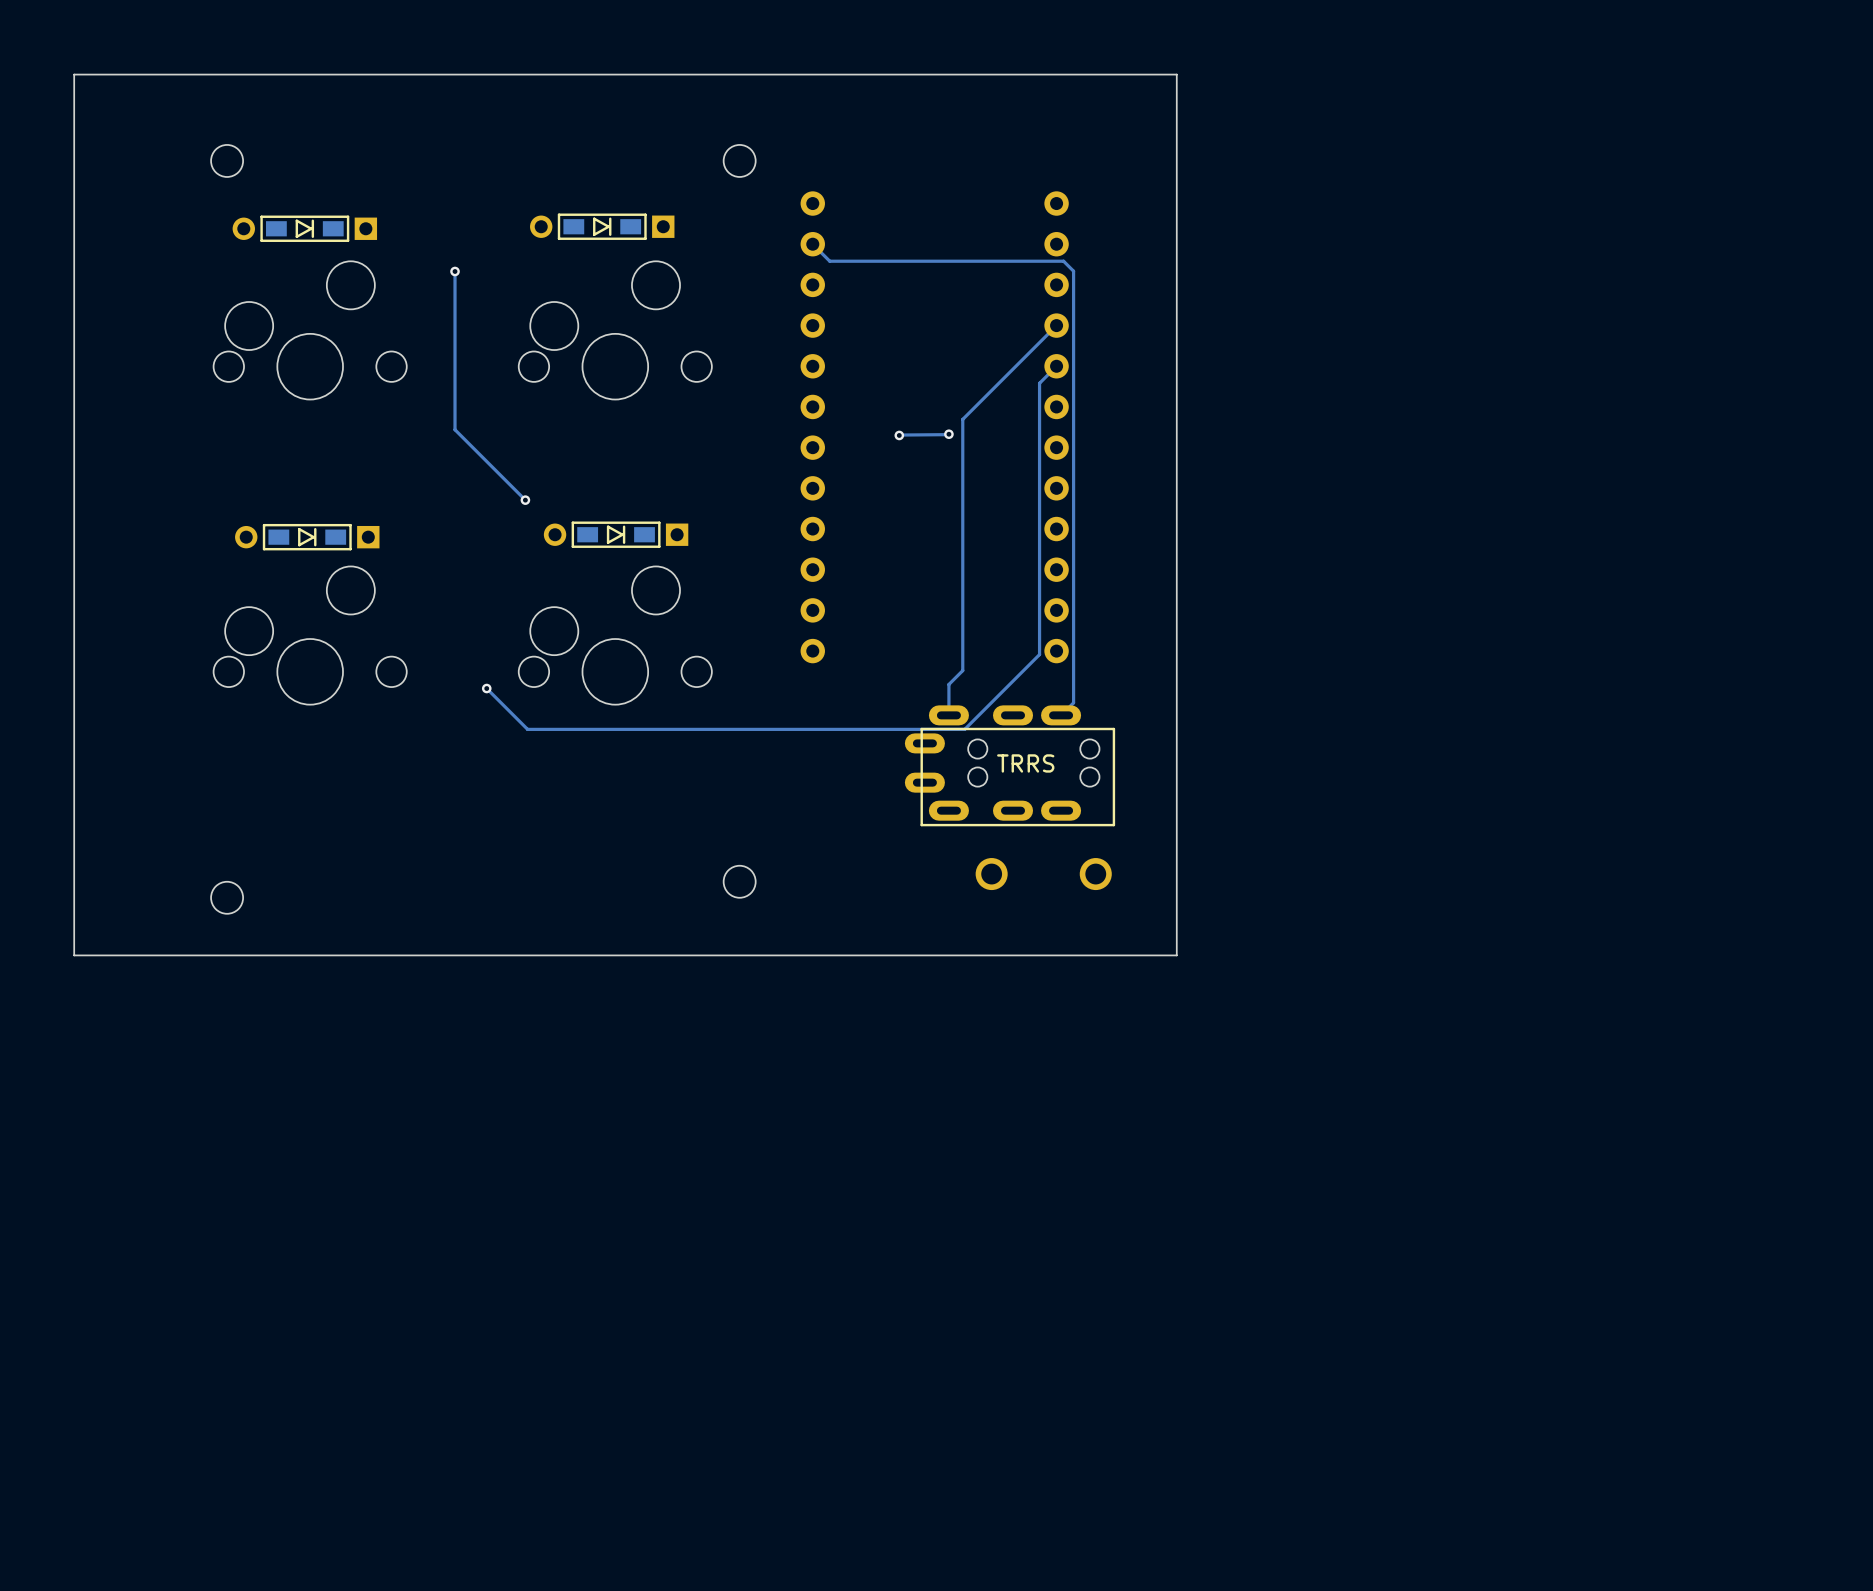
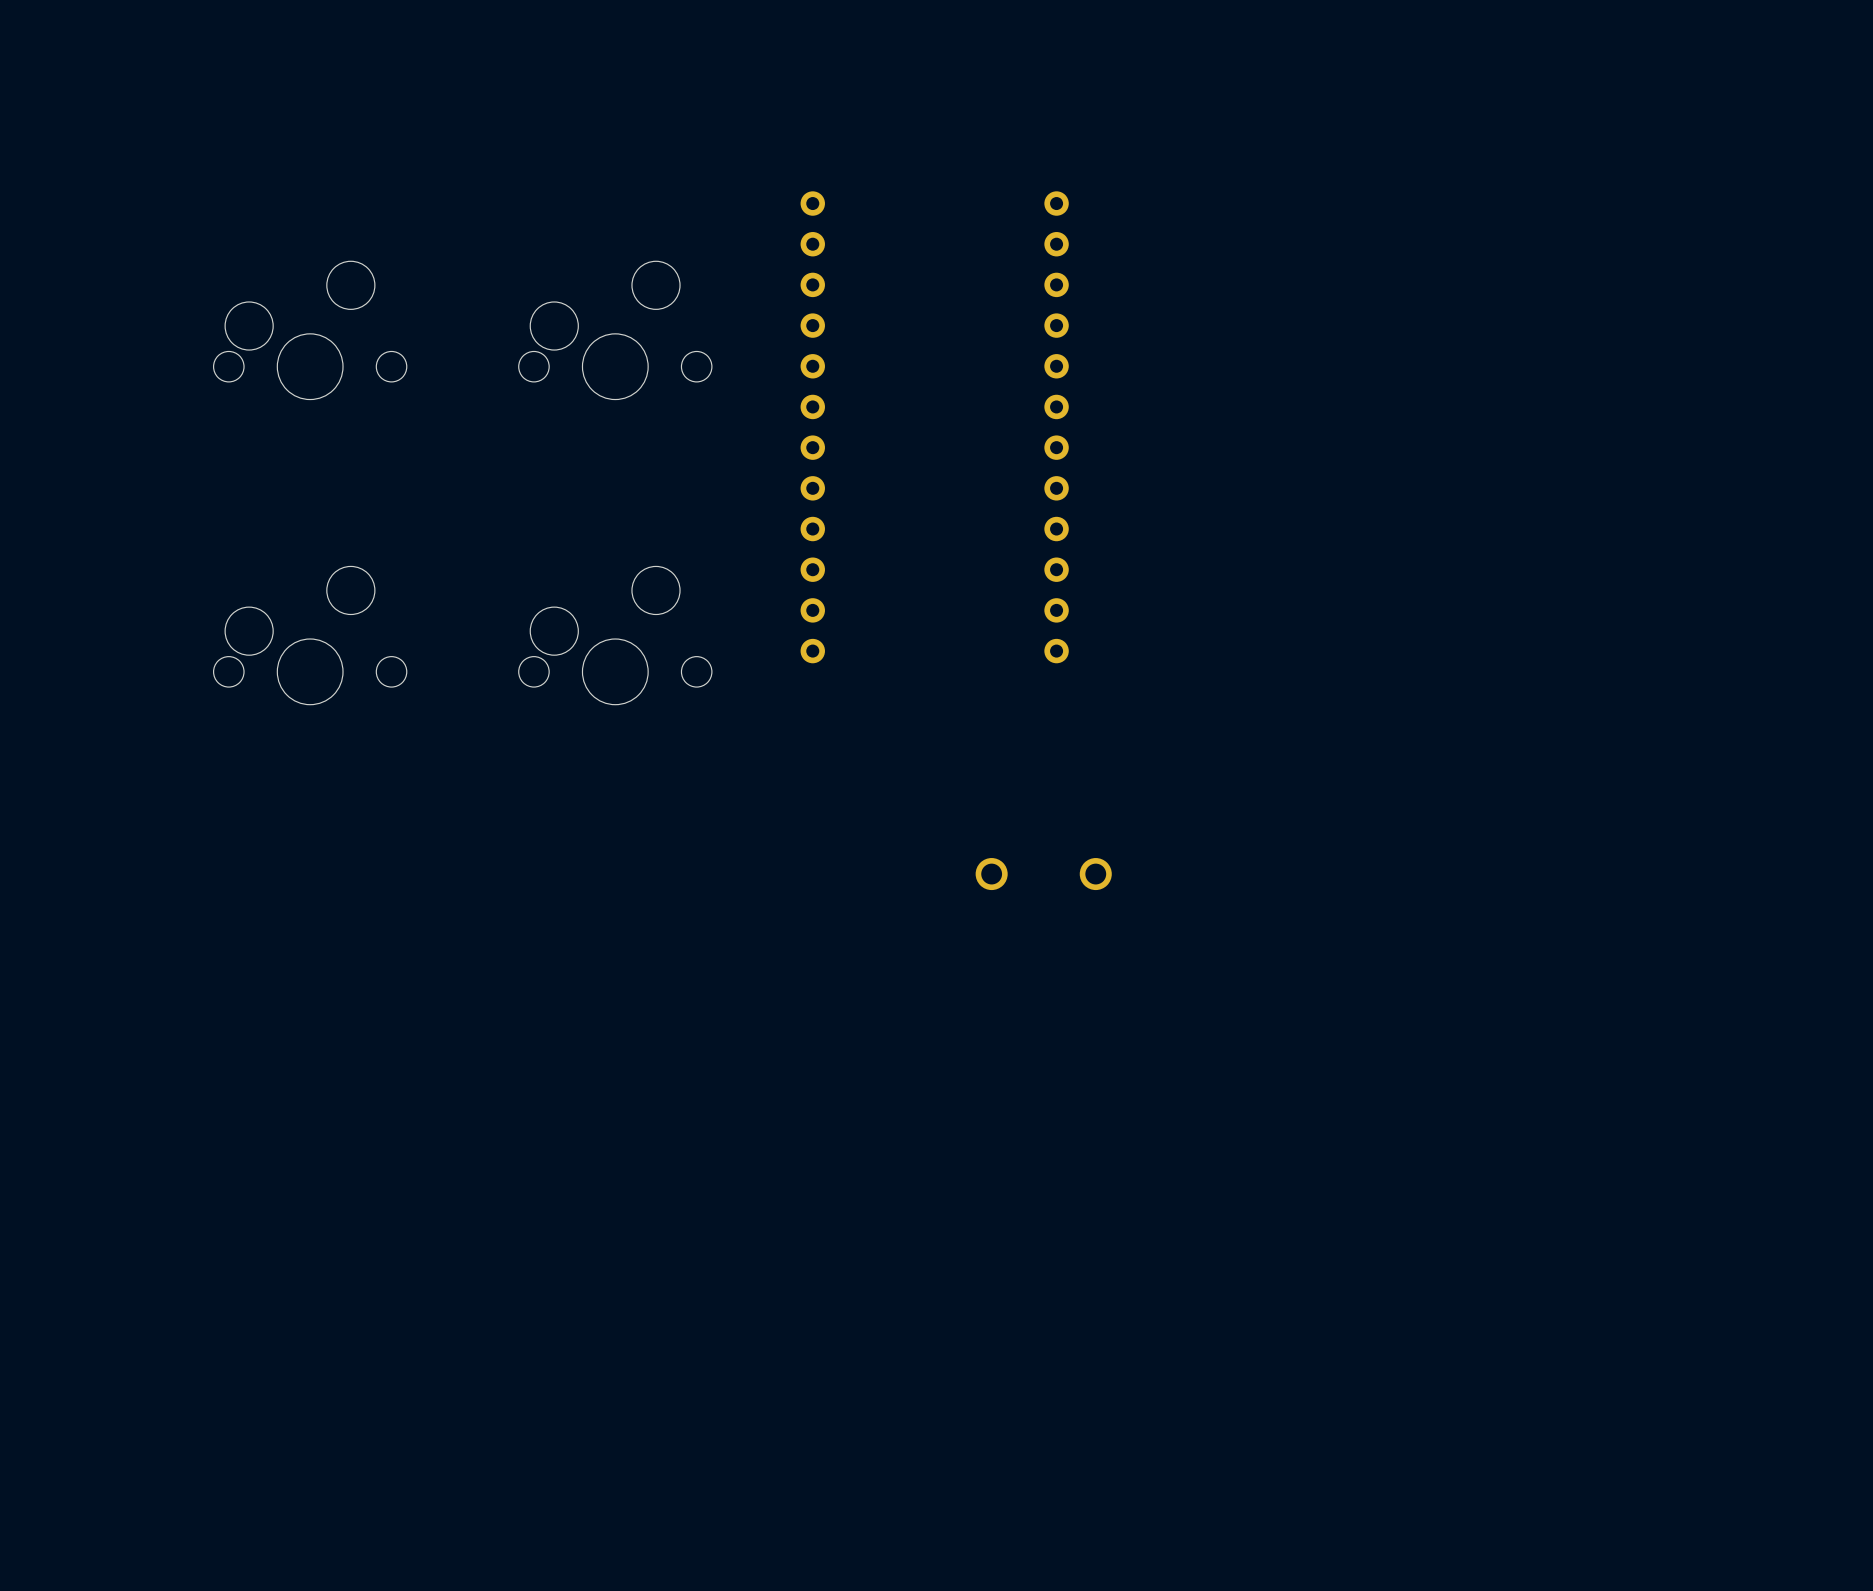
board edge: (1176, 74) (74, 74) (74, 955) (1176, 955) (1176, 74) -> none
round board edge: [210, 144, 244, 178] -> none
round board edge: [723, 144, 757, 178] -> none
part: (602, 226) -> none
part: (304, 228) -> none
track: (812, 244) (829, 261) (1063, 261) (1073, 271) (1073, 702) (1061, 715) -> none
track: (455, 271) (455, 429) (525, 500) -> none
via: (455, 271) -> none
track: (1056, 325) (962, 419) (962, 670) (948, 684) (948, 715) -> none
track: (1056, 366) (1039, 383) (1039, 654) (964, 729) (527, 729) (486, 688) -> none
via: (948, 434) -> none
track: (949, 434) (899, 435) -> none
via: (899, 435) -> none
via: (525, 500) -> none
part: (616, 534) -> none
part: (307, 537) -> none
via: (486, 688) -> none
part: (1010, 765) -> none
round board edge: [723, 865, 757, 899] -> none
round board edge: [210, 881, 244, 915] -> none

